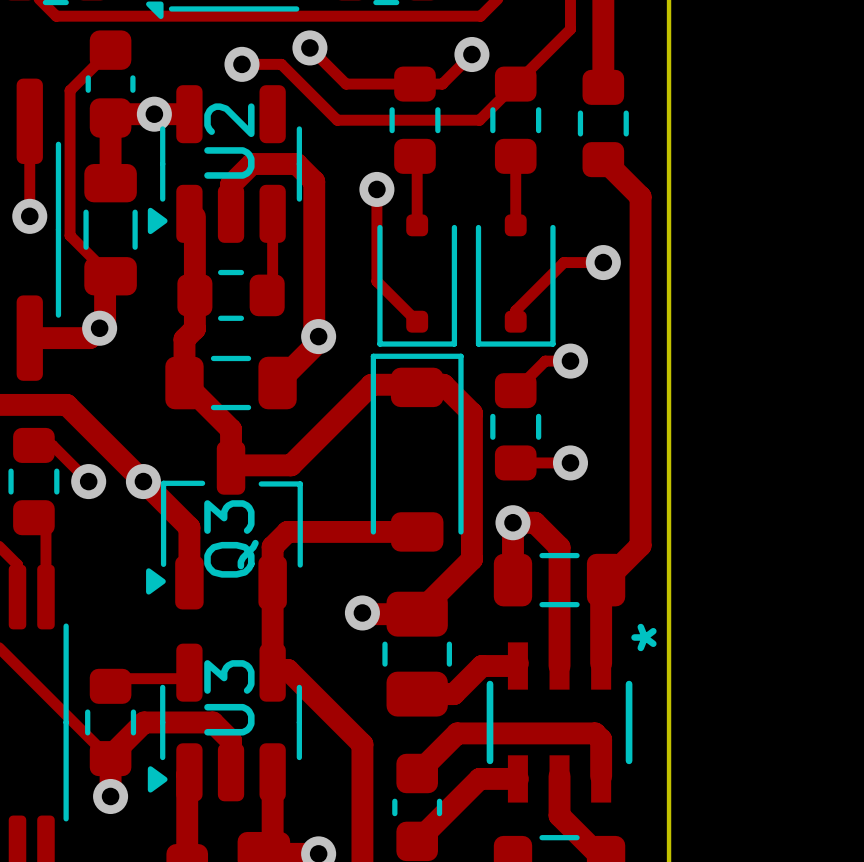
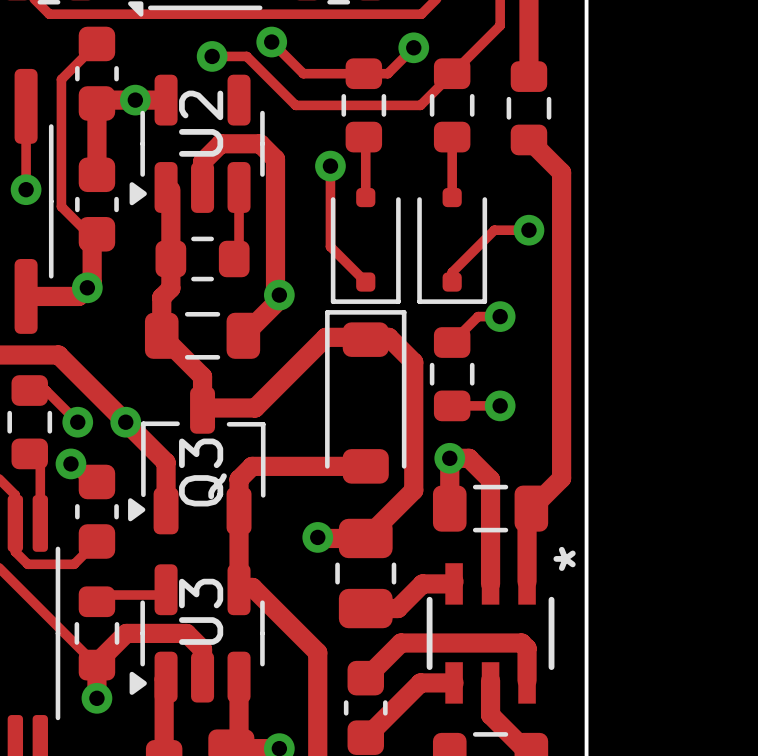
part footprint: [83, 164, 138, 296] -> [75, 157, 119, 252]
via: none -> (70, 463)
part: none -> (96, 511)
track: none -> (15, 523) (15, 551) (27, 564) (74, 564) (96, 541)

